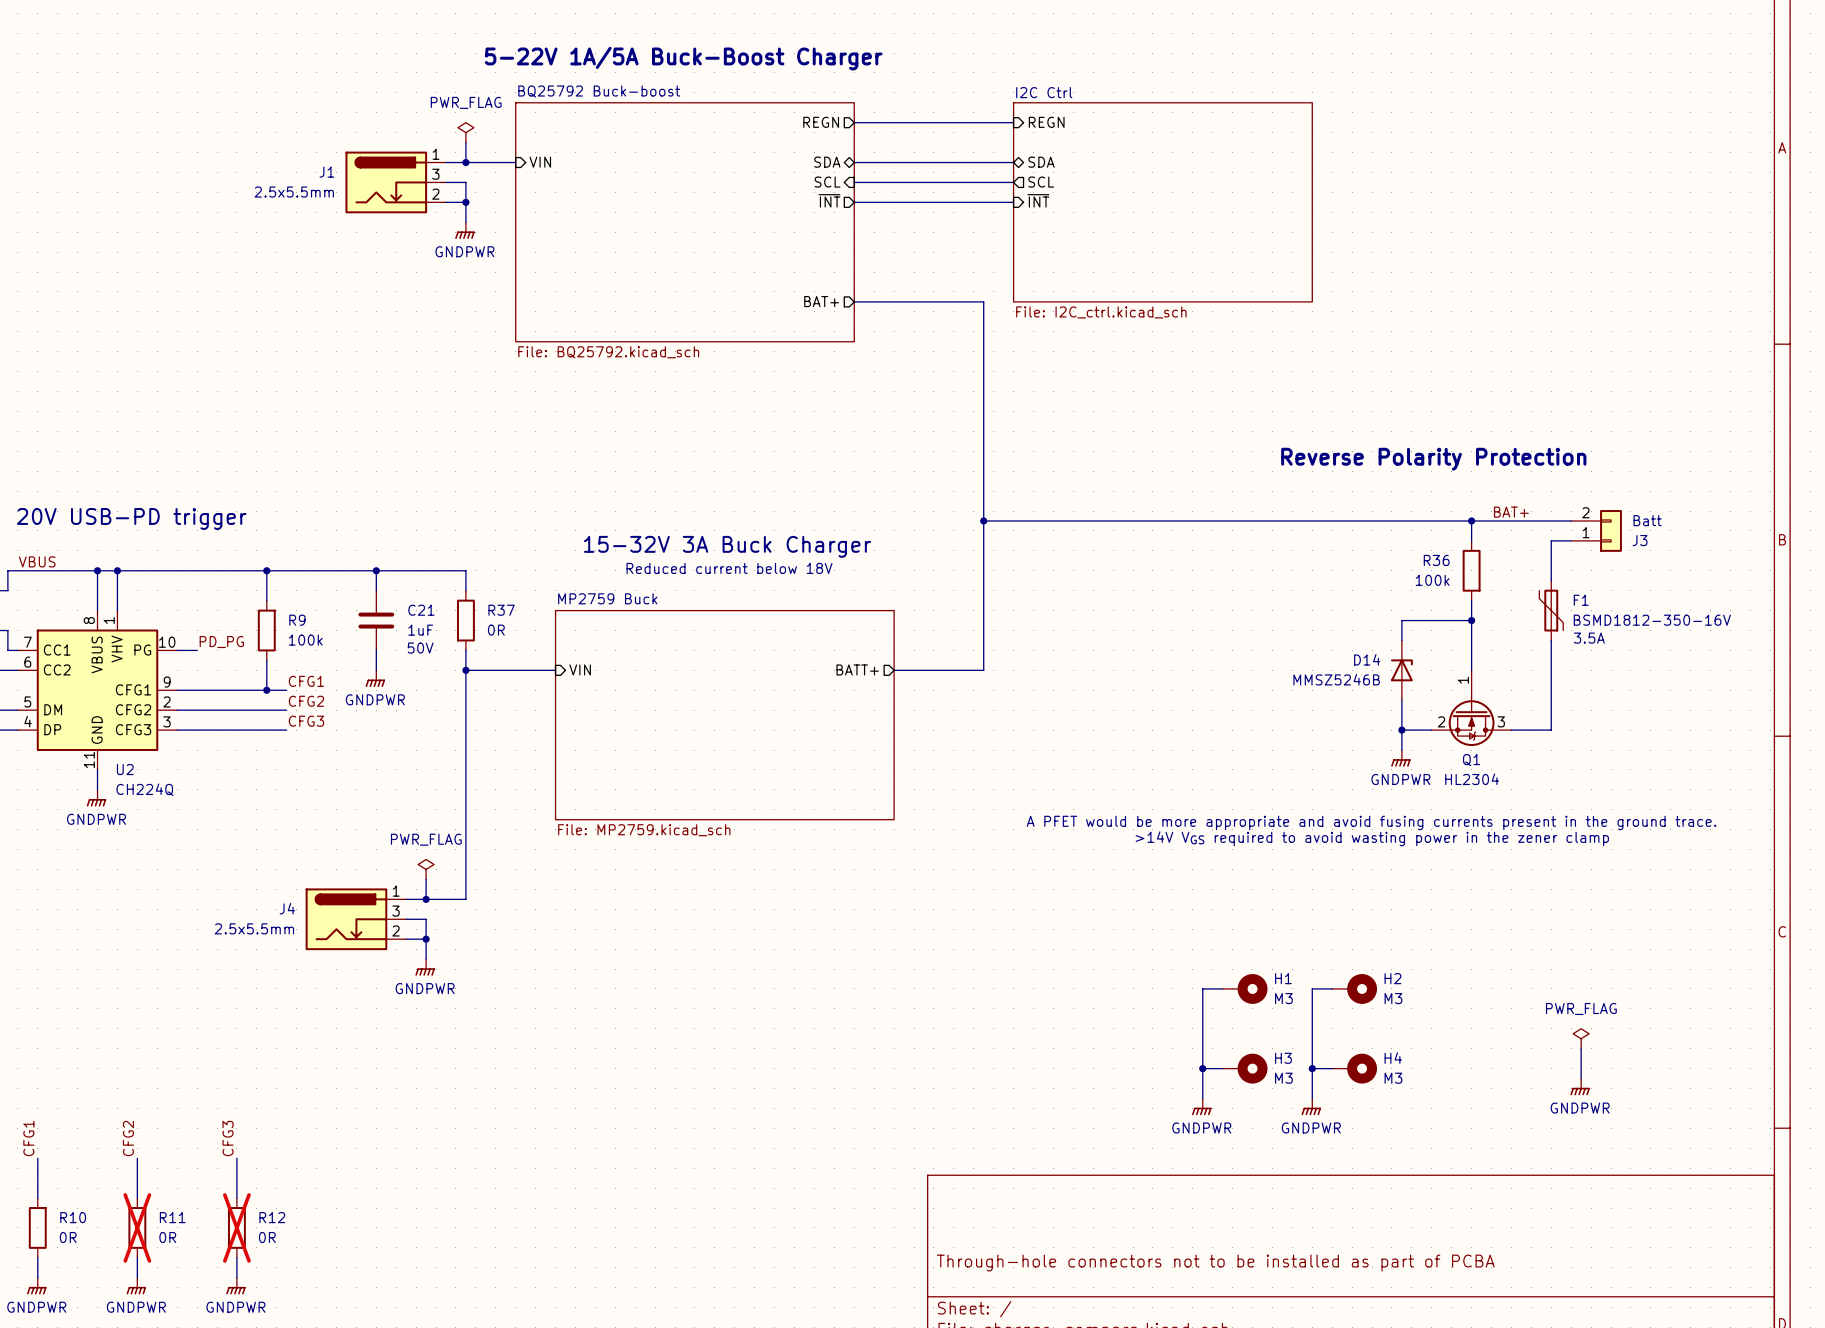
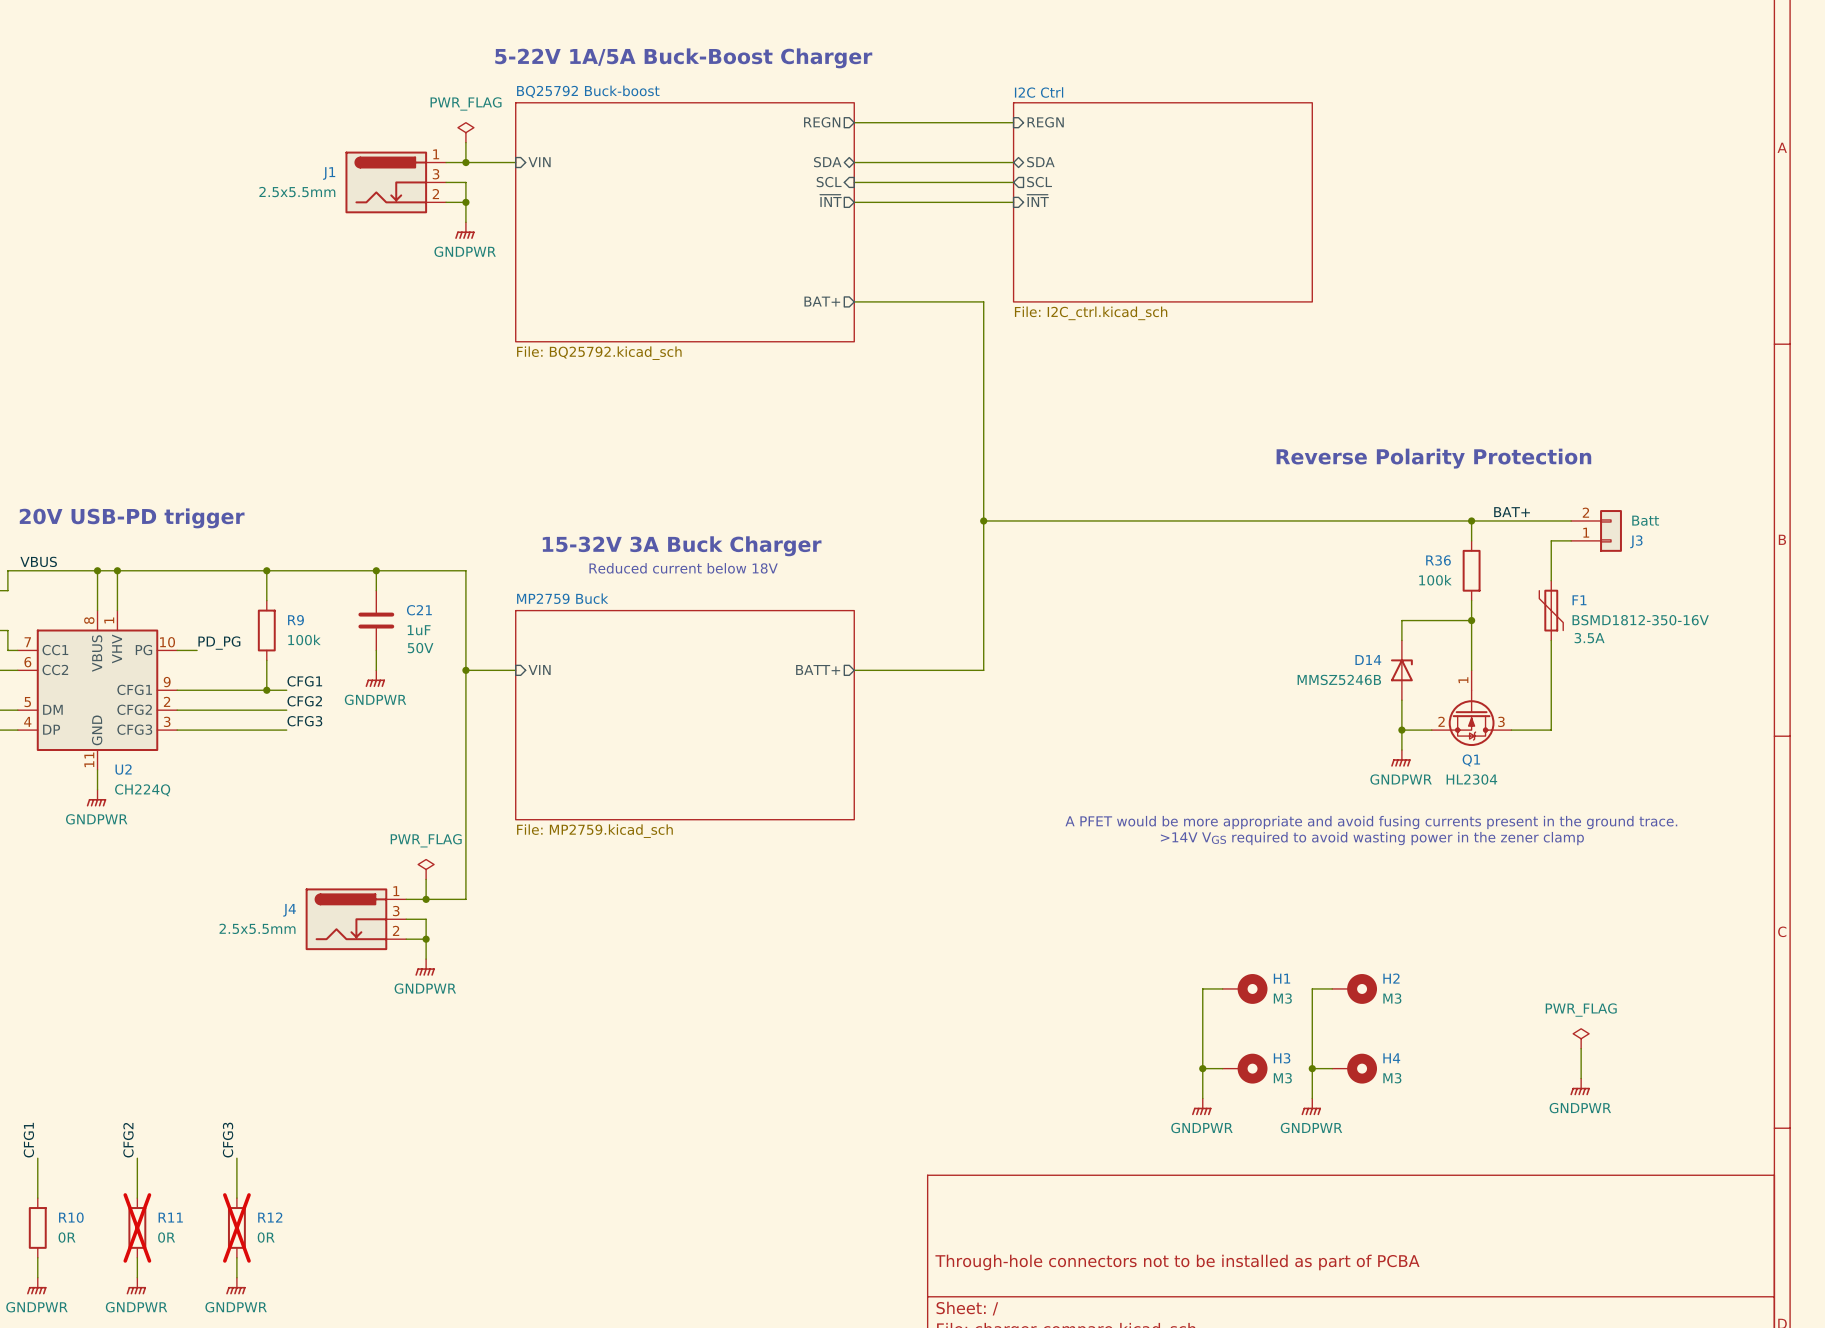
text position: 15-32V 3A Buck Charger (727, 546) -> 15-32V 3A Buck Charger (682, 546)
text position: Reduced current below 18V (729, 568) -> Reduced current below 18V (683, 568)
wire: none -> (465, 590) (465, 650)
R37: 0R (465, 620) -> none
sheet pin position: VIN (580, 669) -> VIN (539, 669)
sheet pin position: BATT+ (857, 669) -> BATT+ (818, 669)
wire: (515, 670) (555, 670) -> none
wire: none -> (854, 670) (894, 670)
sheet MP2759 Buck position: (724, 715) -> (684, 715)

